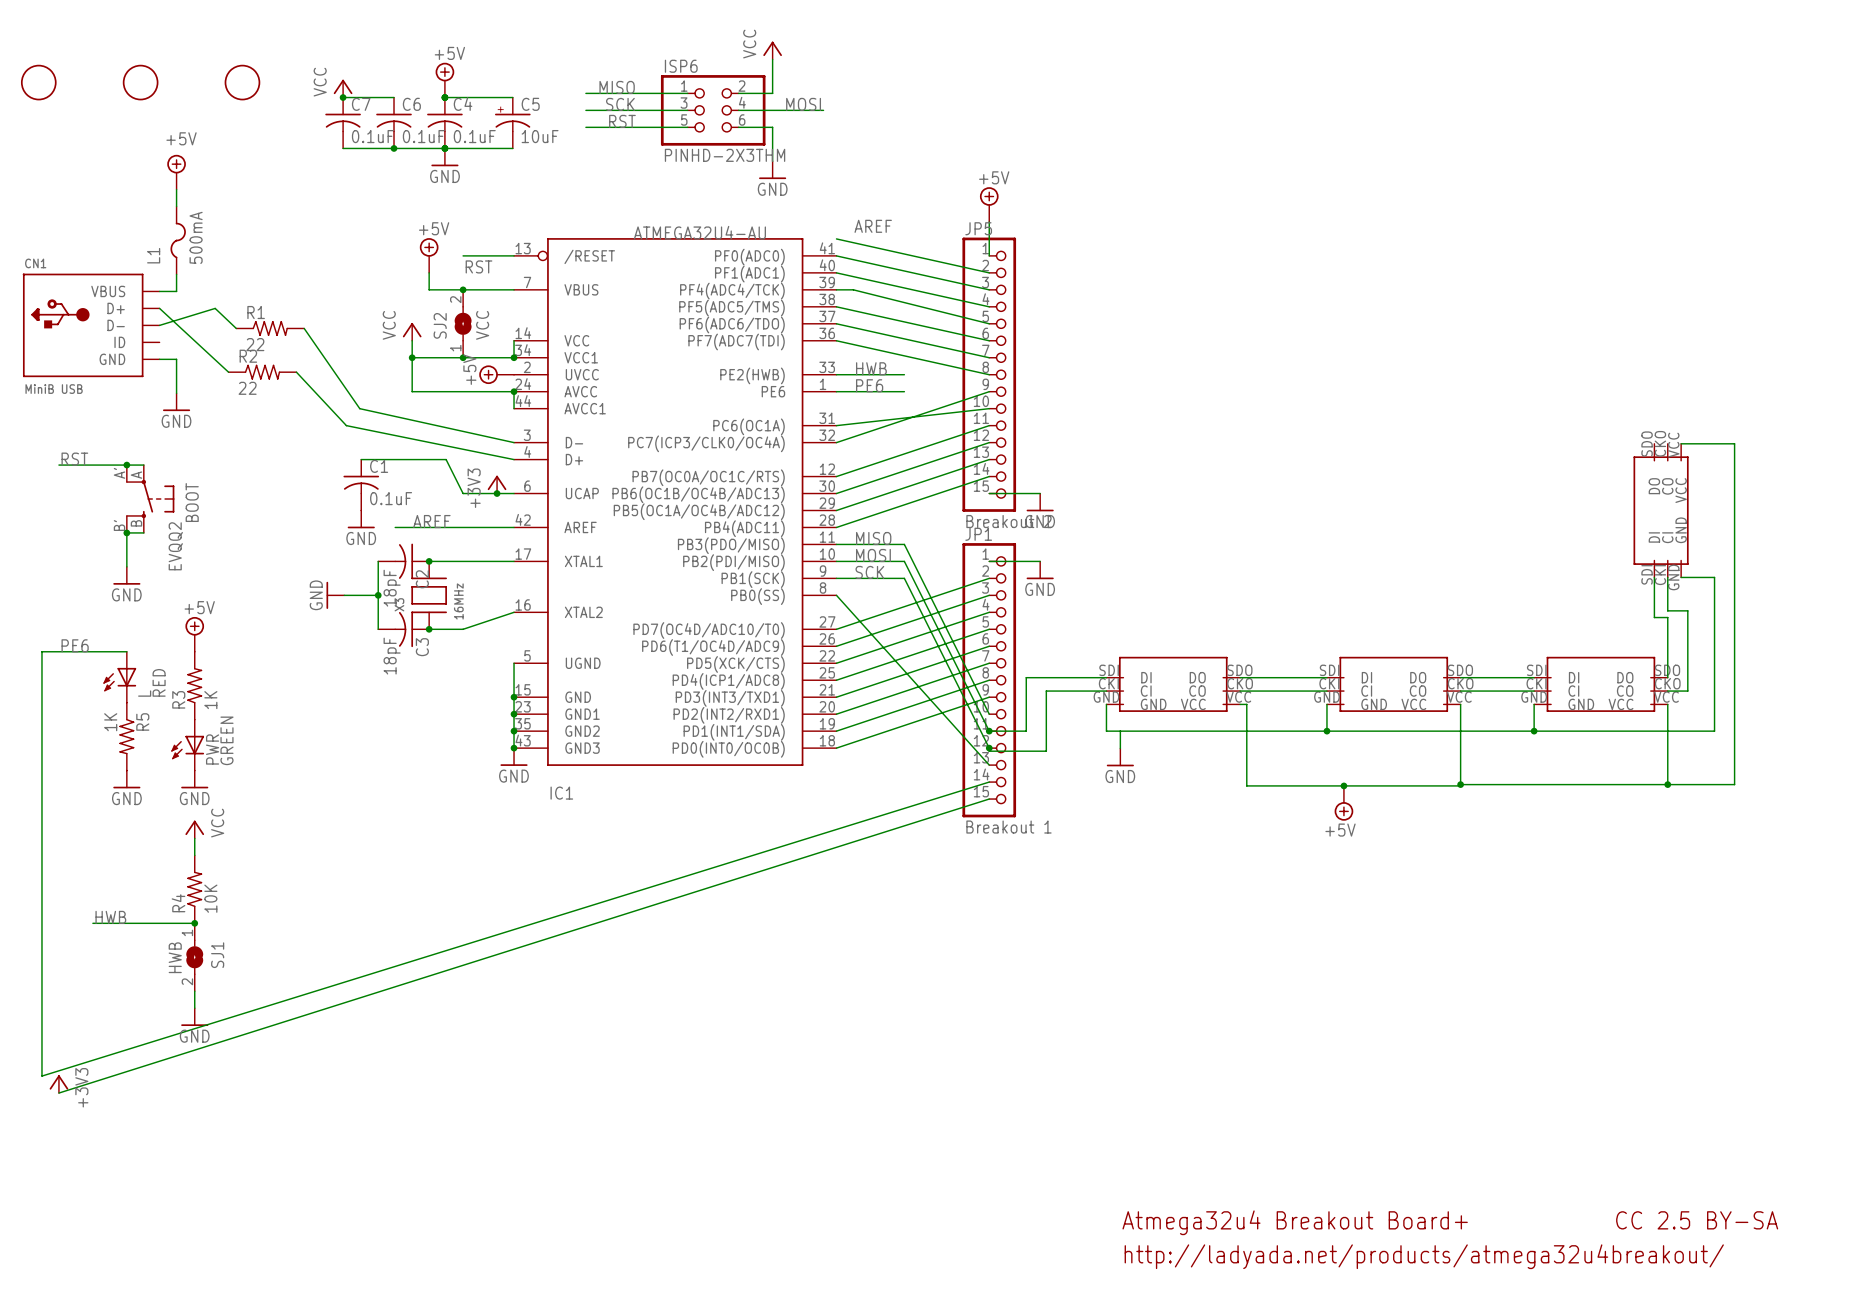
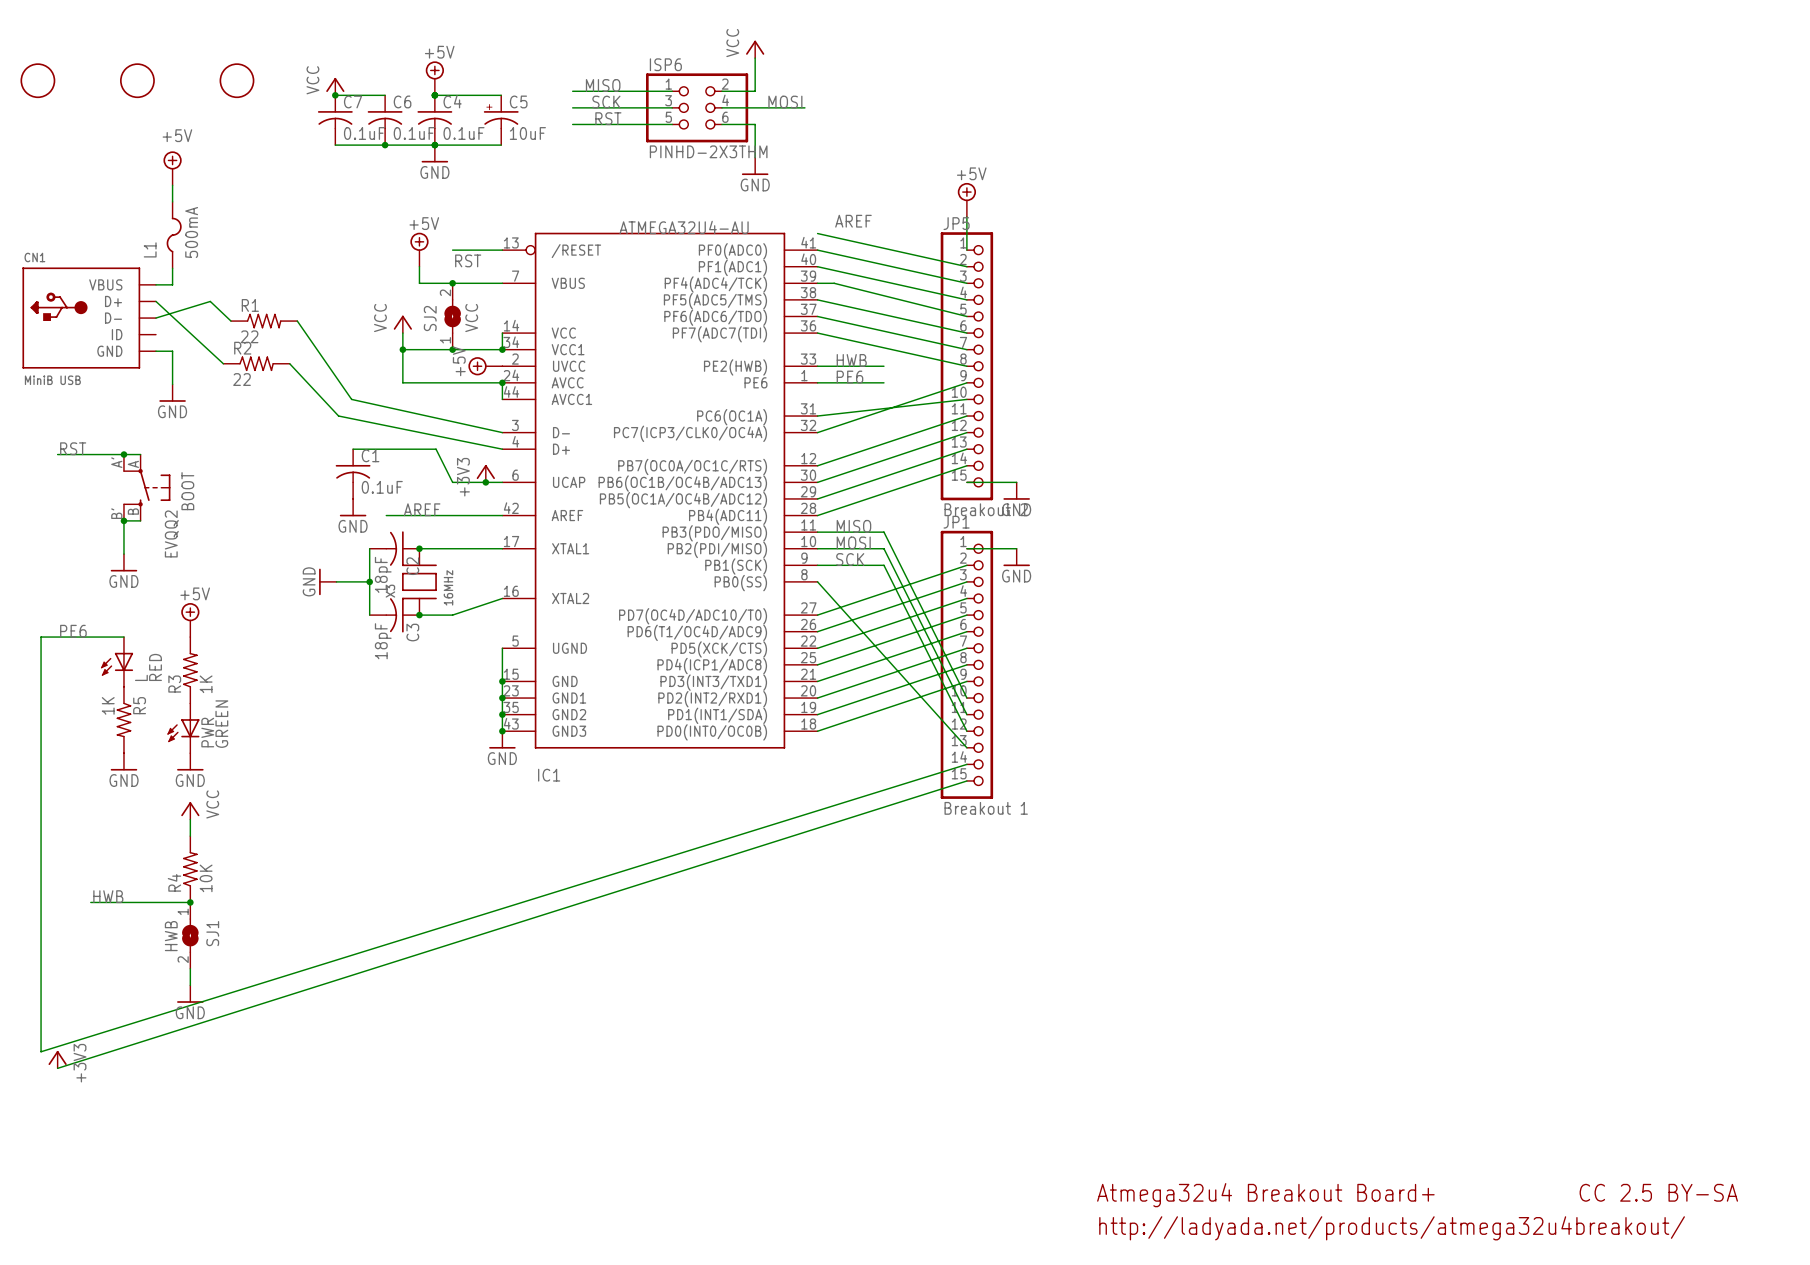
wire: (1681, 443) (1734, 443) (1734, 784) (1460, 784) -> none
part: (1661, 510) -> none
wire: (1654, 577) (1654, 617) (1667, 617) (1667, 677) -> none
wire: (1667, 577) (1667, 610) (1687, 610) (1687, 691) (1667, 691) -> none
wire: (1681, 577) (1714, 577) (1714, 731) (1106, 731) (1106, 704) -> none
wire: (1106, 677) (1026, 677) (1026, 731) (989, 731) -> none
wire: (1240, 677) (1326, 677) -> none
wire: (1460, 677) (1534, 677) -> none
part: (1173, 684) -> none
part: (1393, 684) -> none
part: (1600, 684) -> none
wire: (1106, 691) (1046, 691) (1046, 751) (989, 751) (989, 748) -> none
wire: (1240, 691) (1326, 691) -> none
wire: (1460, 691) (1534, 691) -> none
wire: (1240, 704) (1246, 704) (1246, 785) (1460, 785) (1460, 704) -> none
wire: (1326, 704) (1326, 731) -> none
wire: (1534, 704) (1534, 731) -> none
wire: (1667, 704) (1667, 784) -> none
junction: (989, 731) -> none
wire: (1120, 731) (1120, 748) -> none
junction: (1326, 731) -> none
junction: (1534, 731) -> none
junction: (989, 748) -> none
power symbol: GND (1120, 757) -> none
junction: (1460, 784) -> none
junction: (1667, 784) -> none
junction: (1343, 785) -> none
power symbol: +5V (1343, 803) -> none

